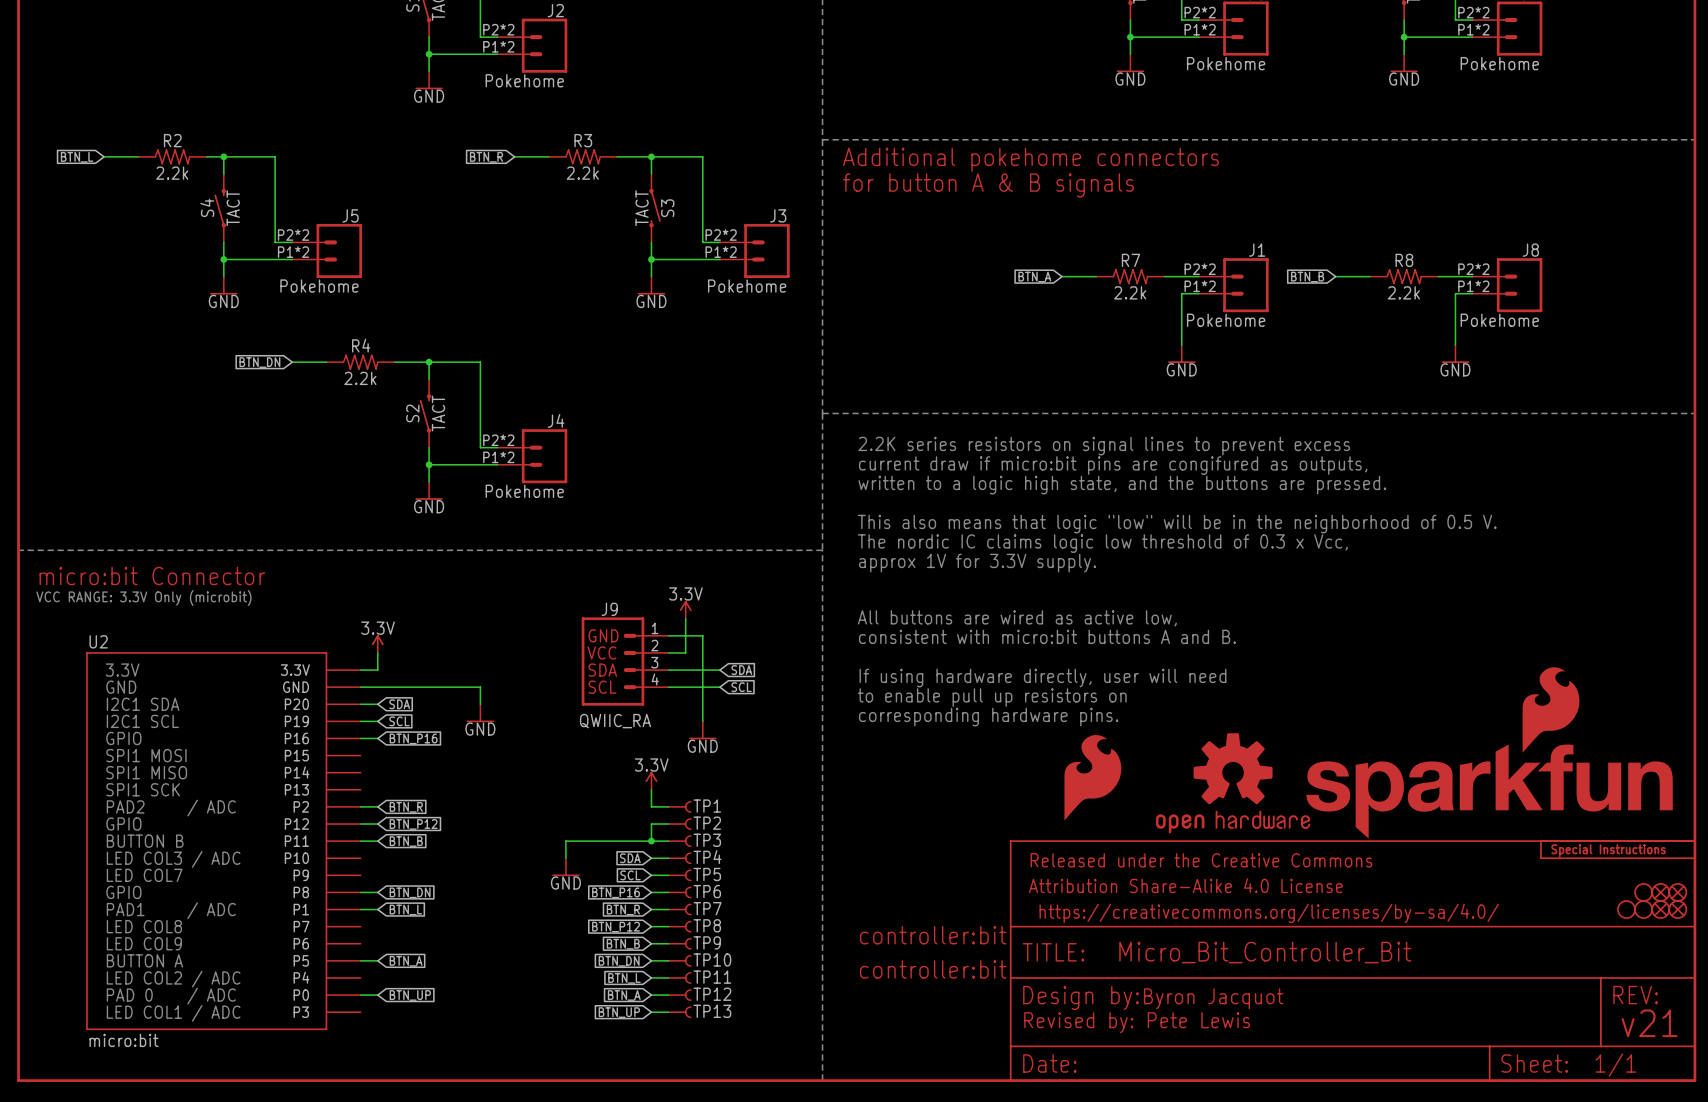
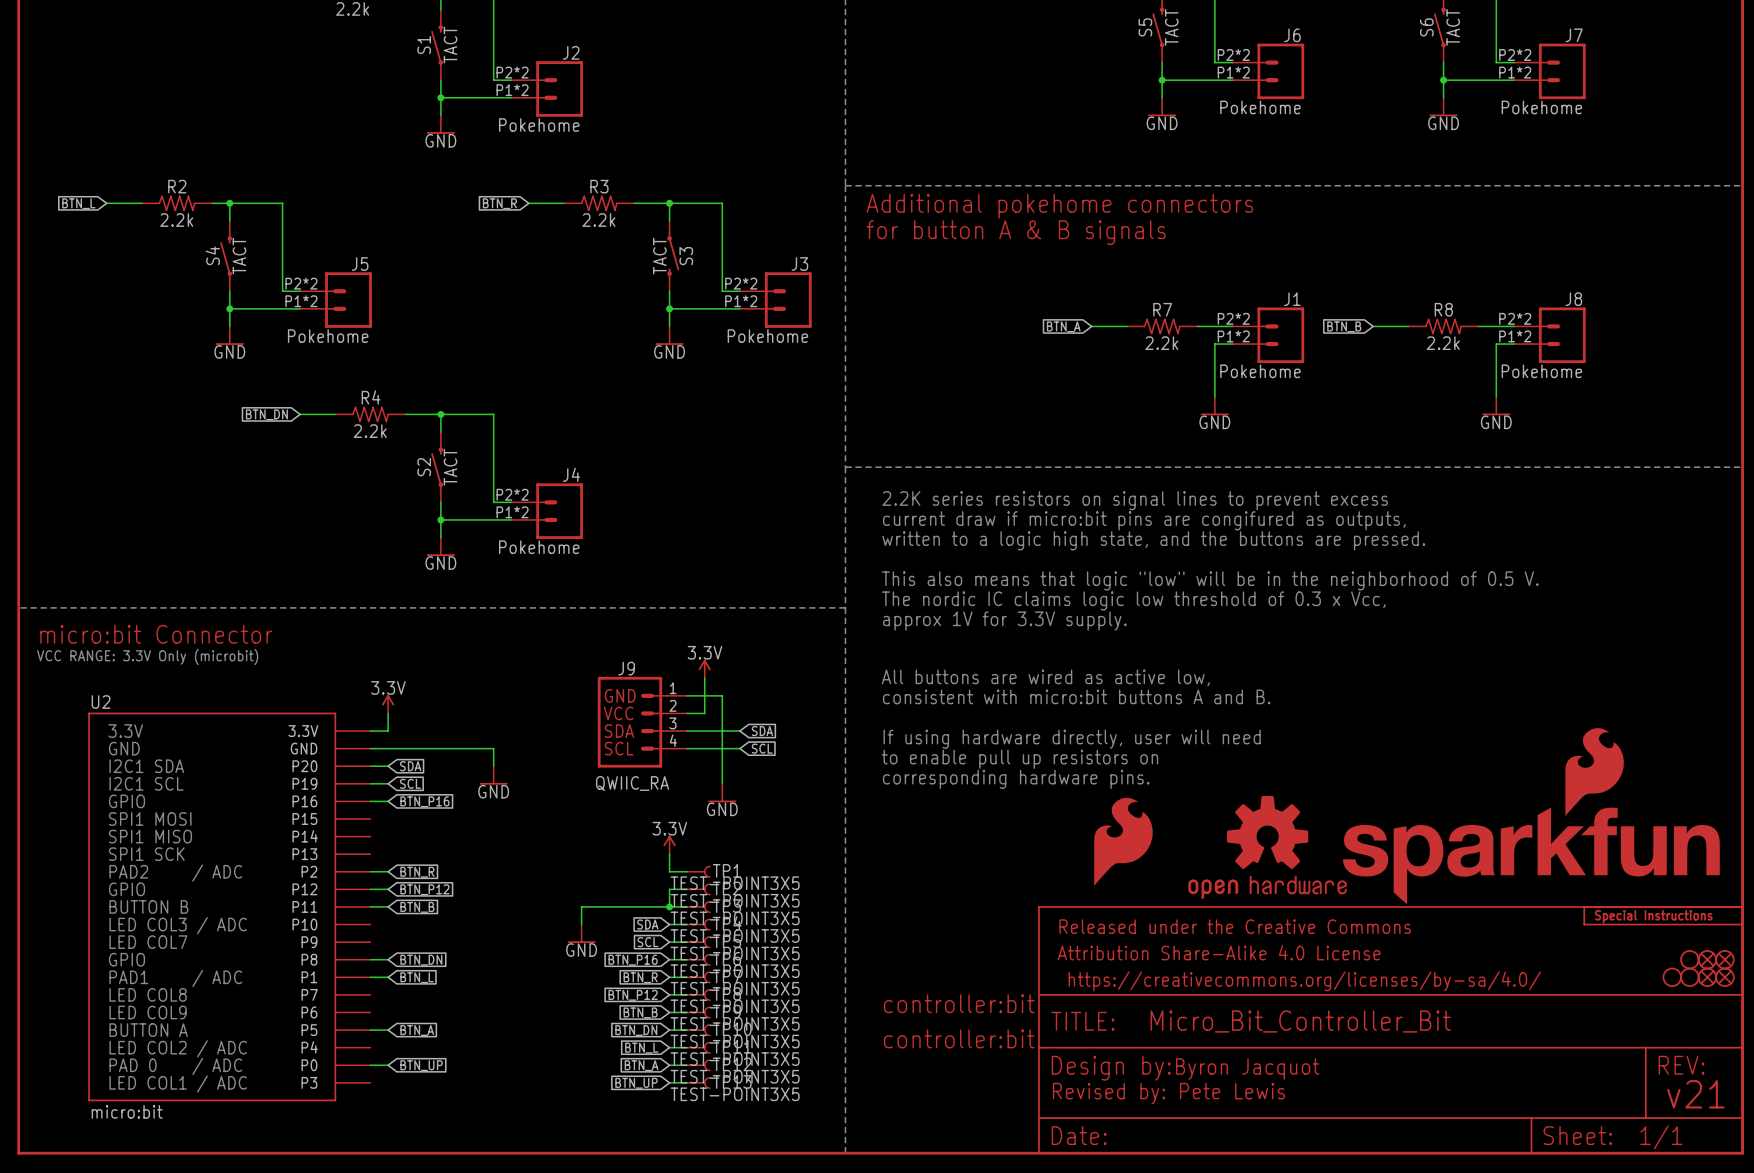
TP1 value: none -> TEST-POINT3X5 (735, 883)
TP2 value: none -> TEST-POINT3X5 (735, 900)
TP3 value: none -> TEST-POINT3X5 (735, 918)
TP4 value: none -> TEST-POINT3X5 (735, 935)
TP5 value: none -> TEST-POINT3X5 (735, 953)
TP6 value: none -> TEST-POINT3X5 (735, 971)
TP7 value: none -> TEST-POINT3X5 (735, 988)
TP8 value: none -> TEST-POINT3X5 (735, 1006)
TP9 value: none -> TEST-POINT3X5 (735, 1023)
TP10 value: none -> TEST-POINT3X5 (735, 1041)
TP11 value: none -> TEST-POINT3X5 (735, 1059)
TP12 value: none -> TEST-POINT3X5 (735, 1076)
TP13 value: none -> TEST-POINT3X5 (735, 1094)

